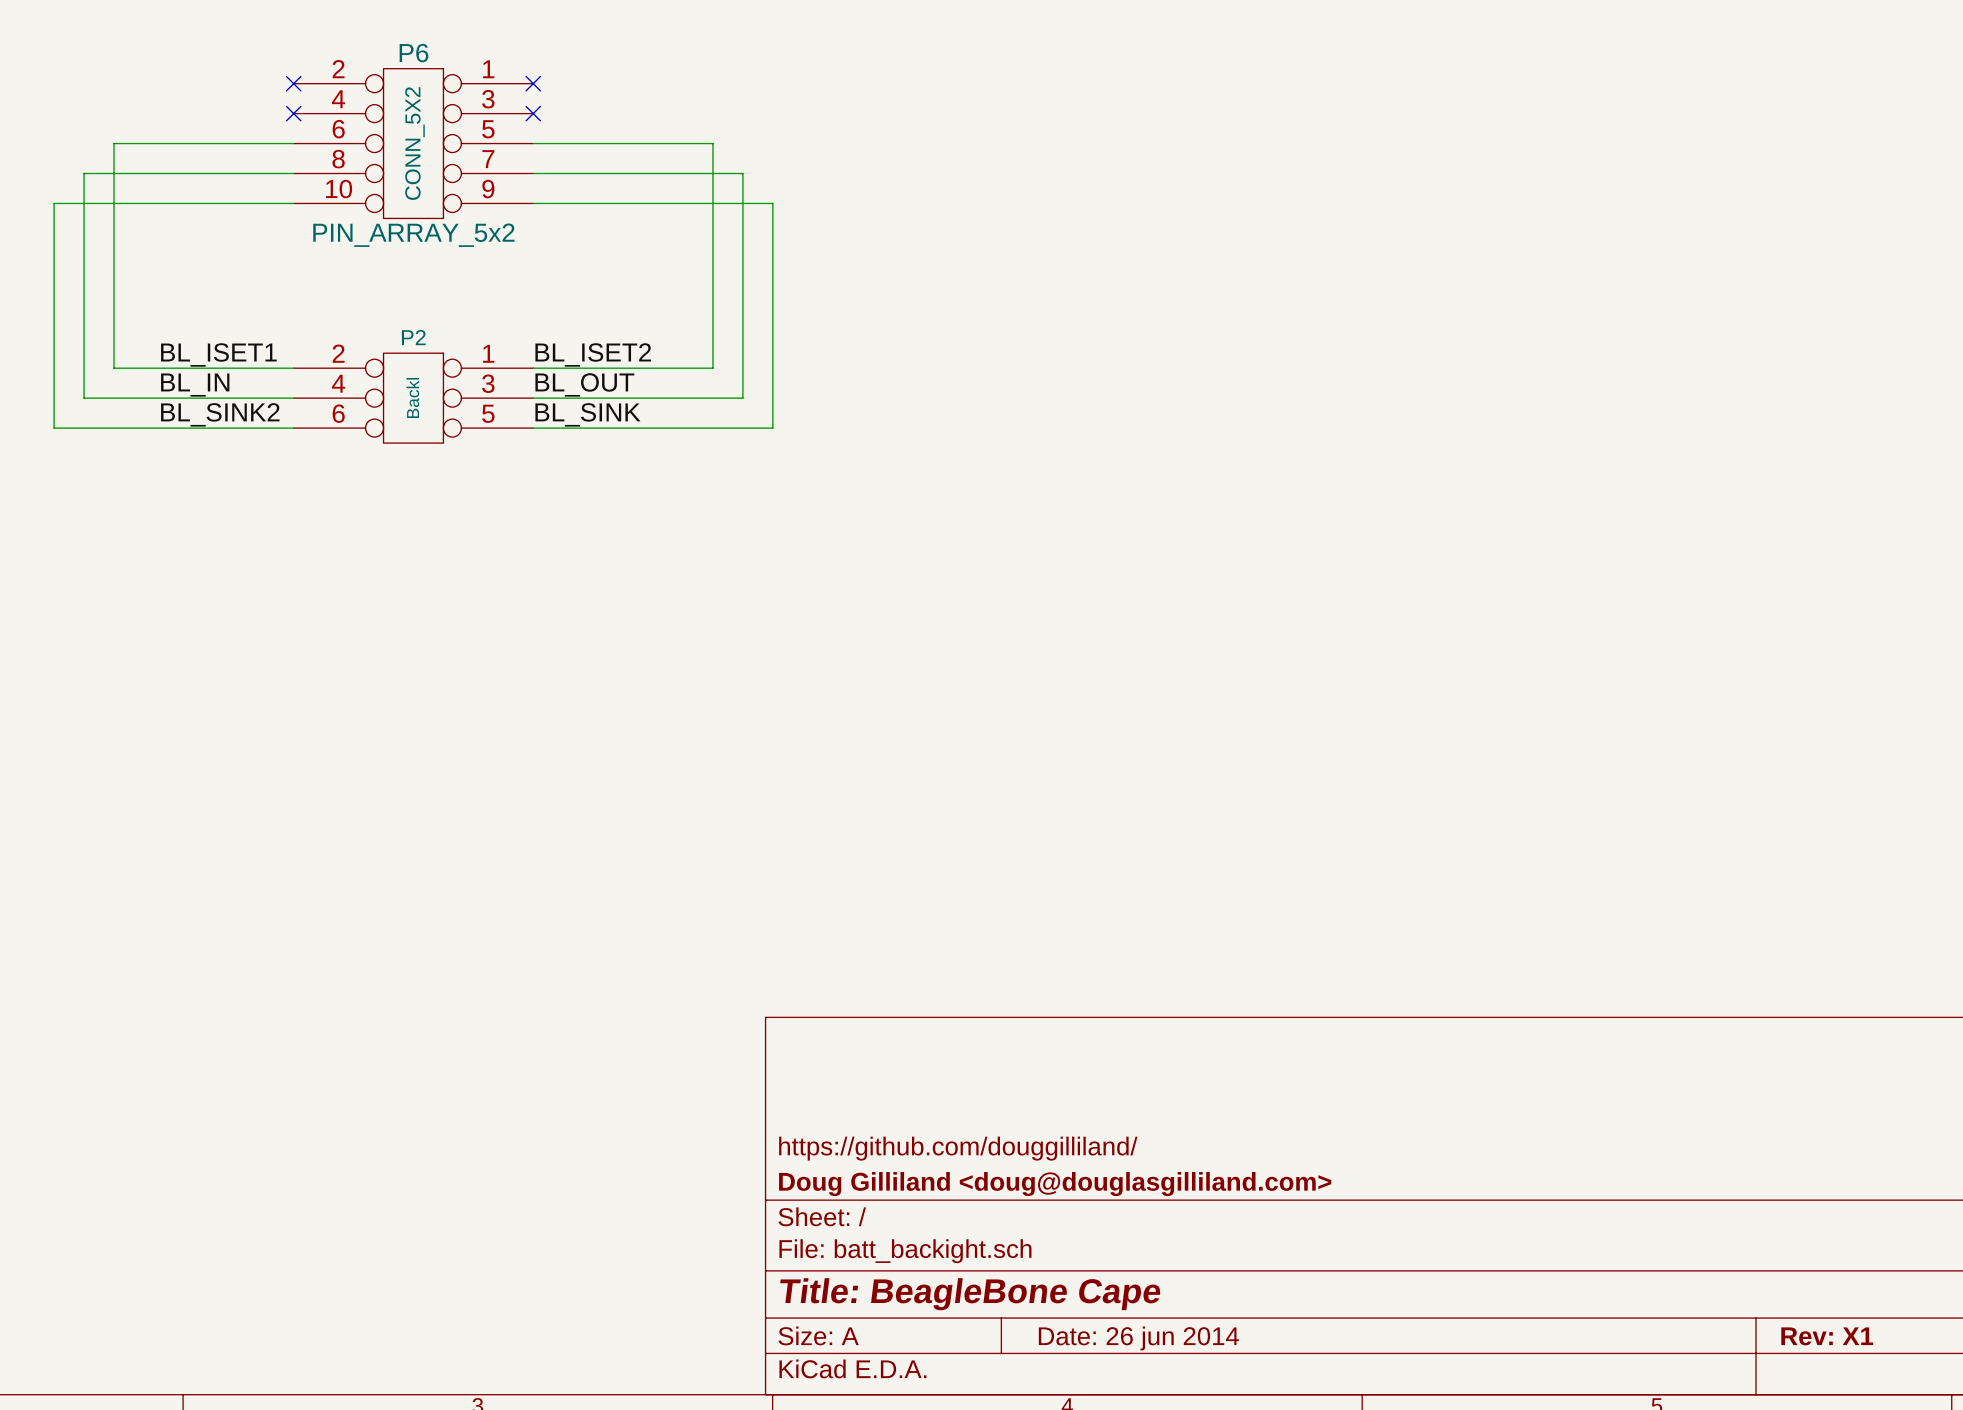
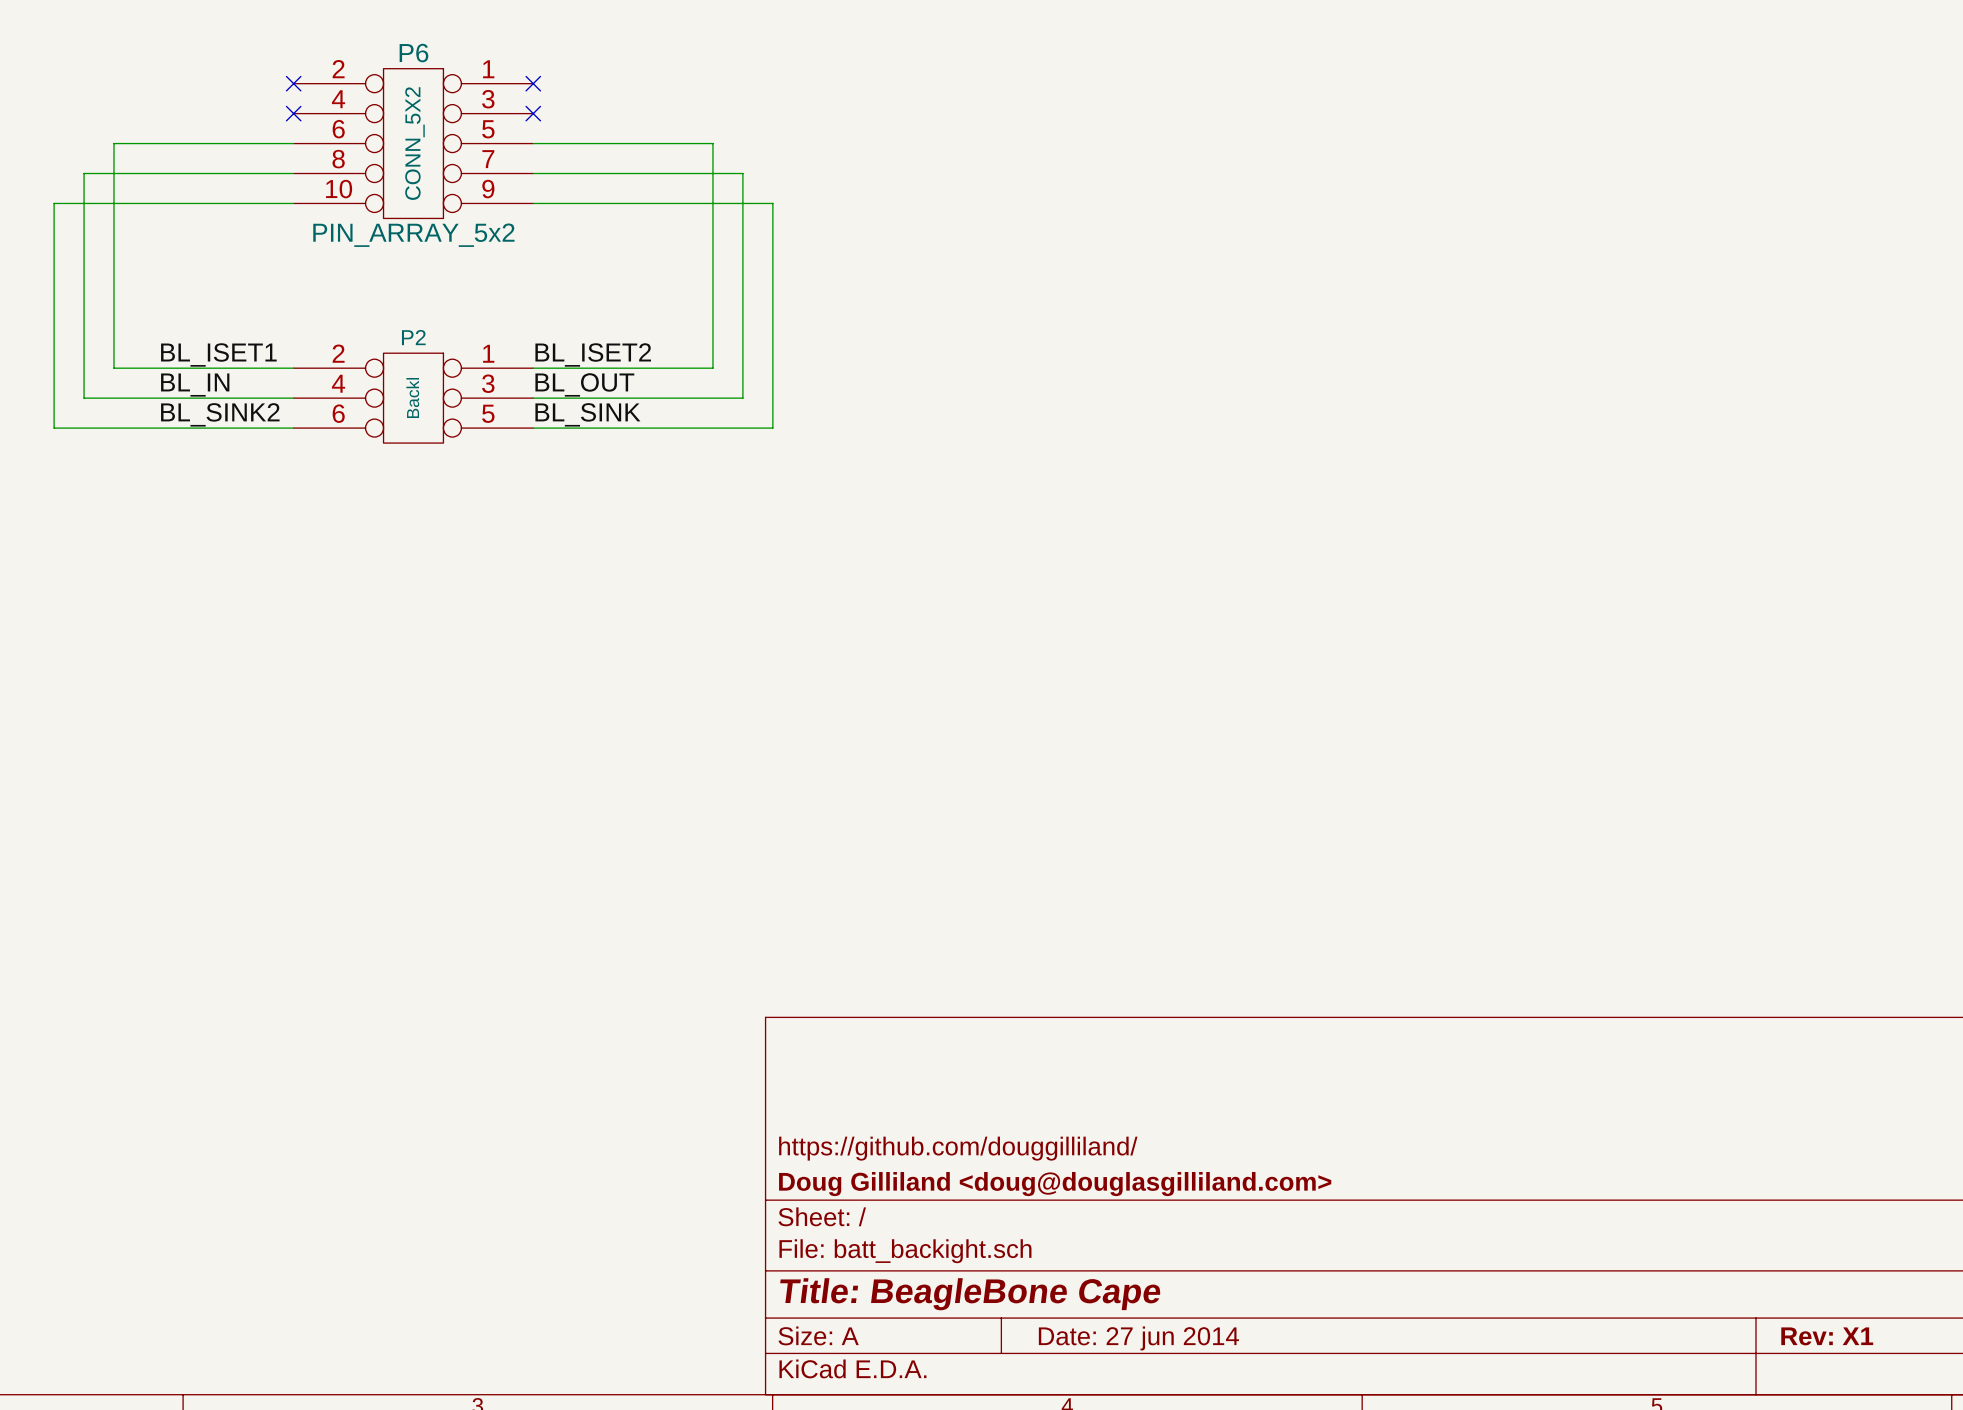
title block: Date: 26 jun 2014 (1138, 1338) -> Date: 27 jun 2014 (1138, 1338)

